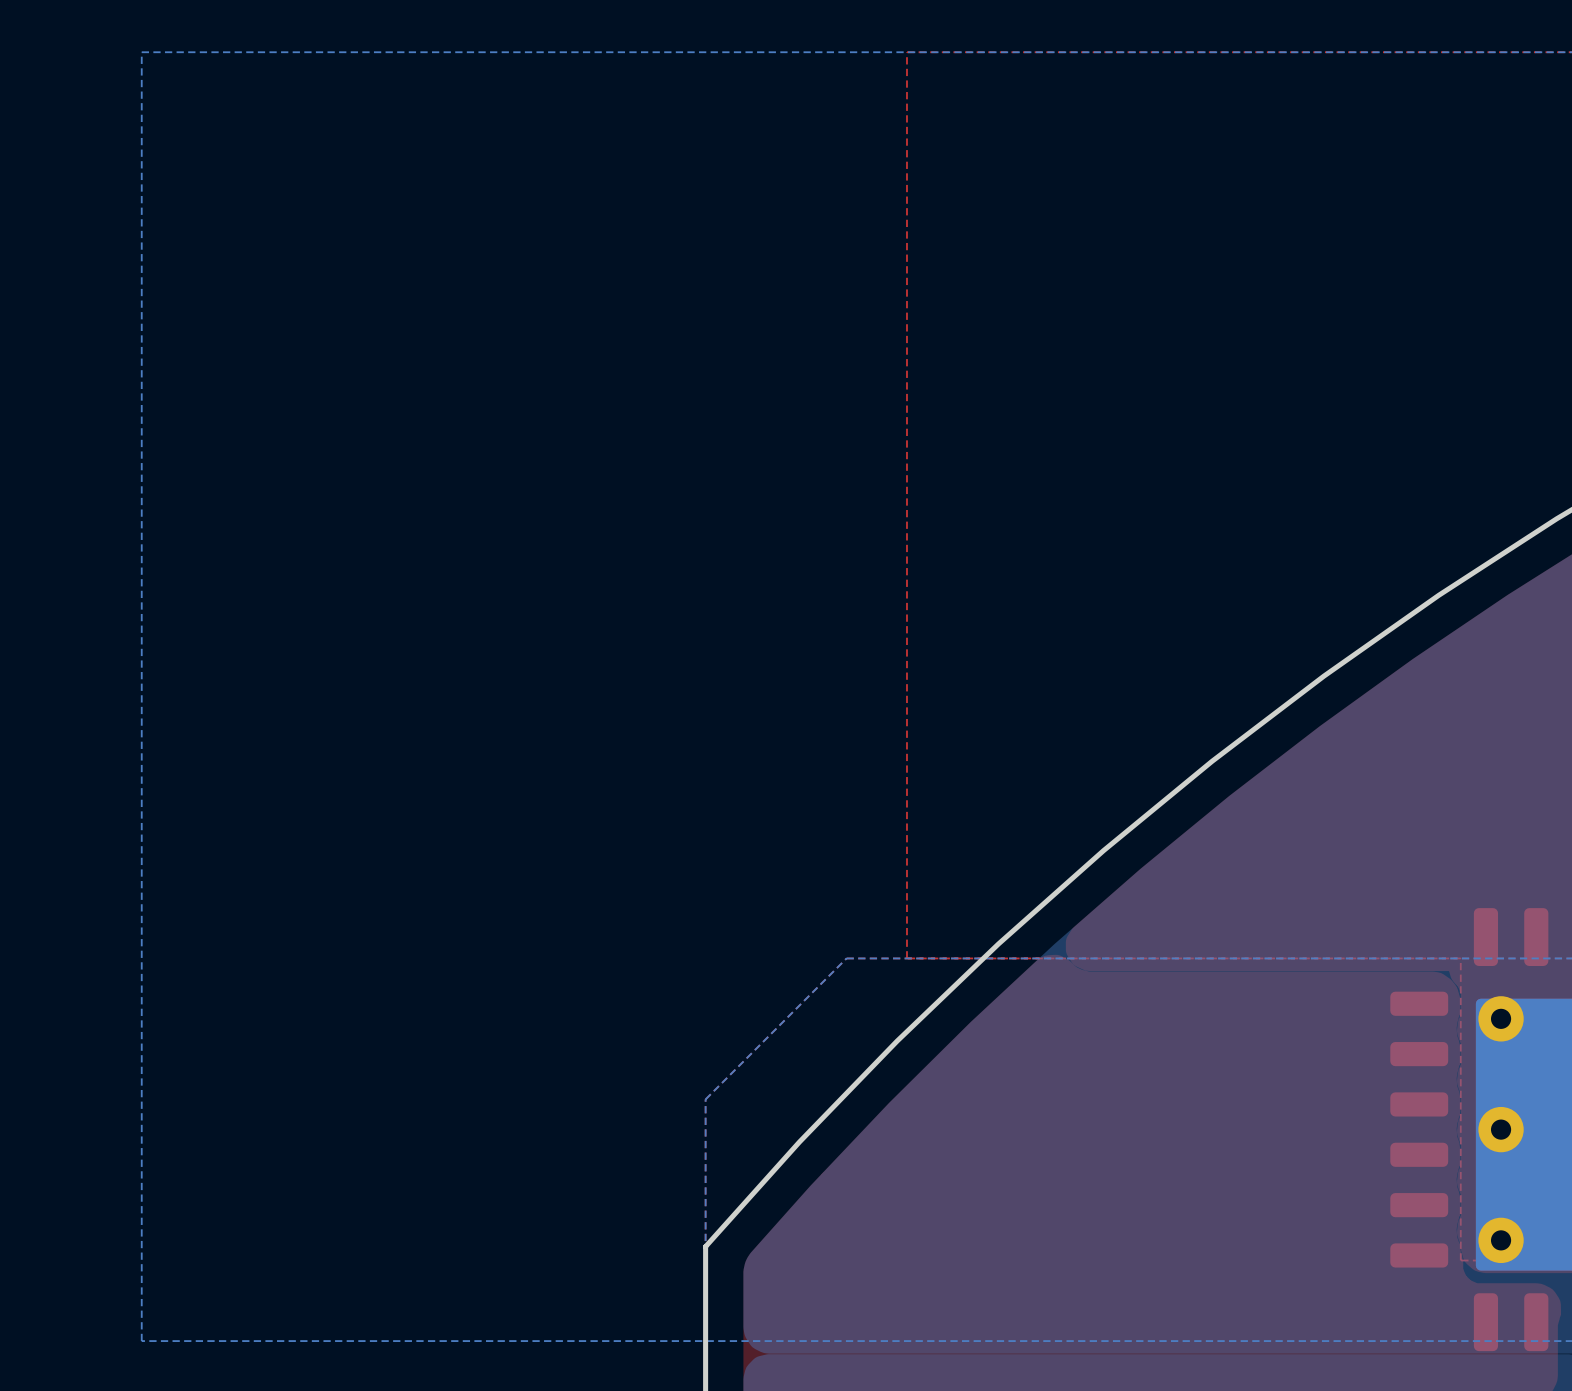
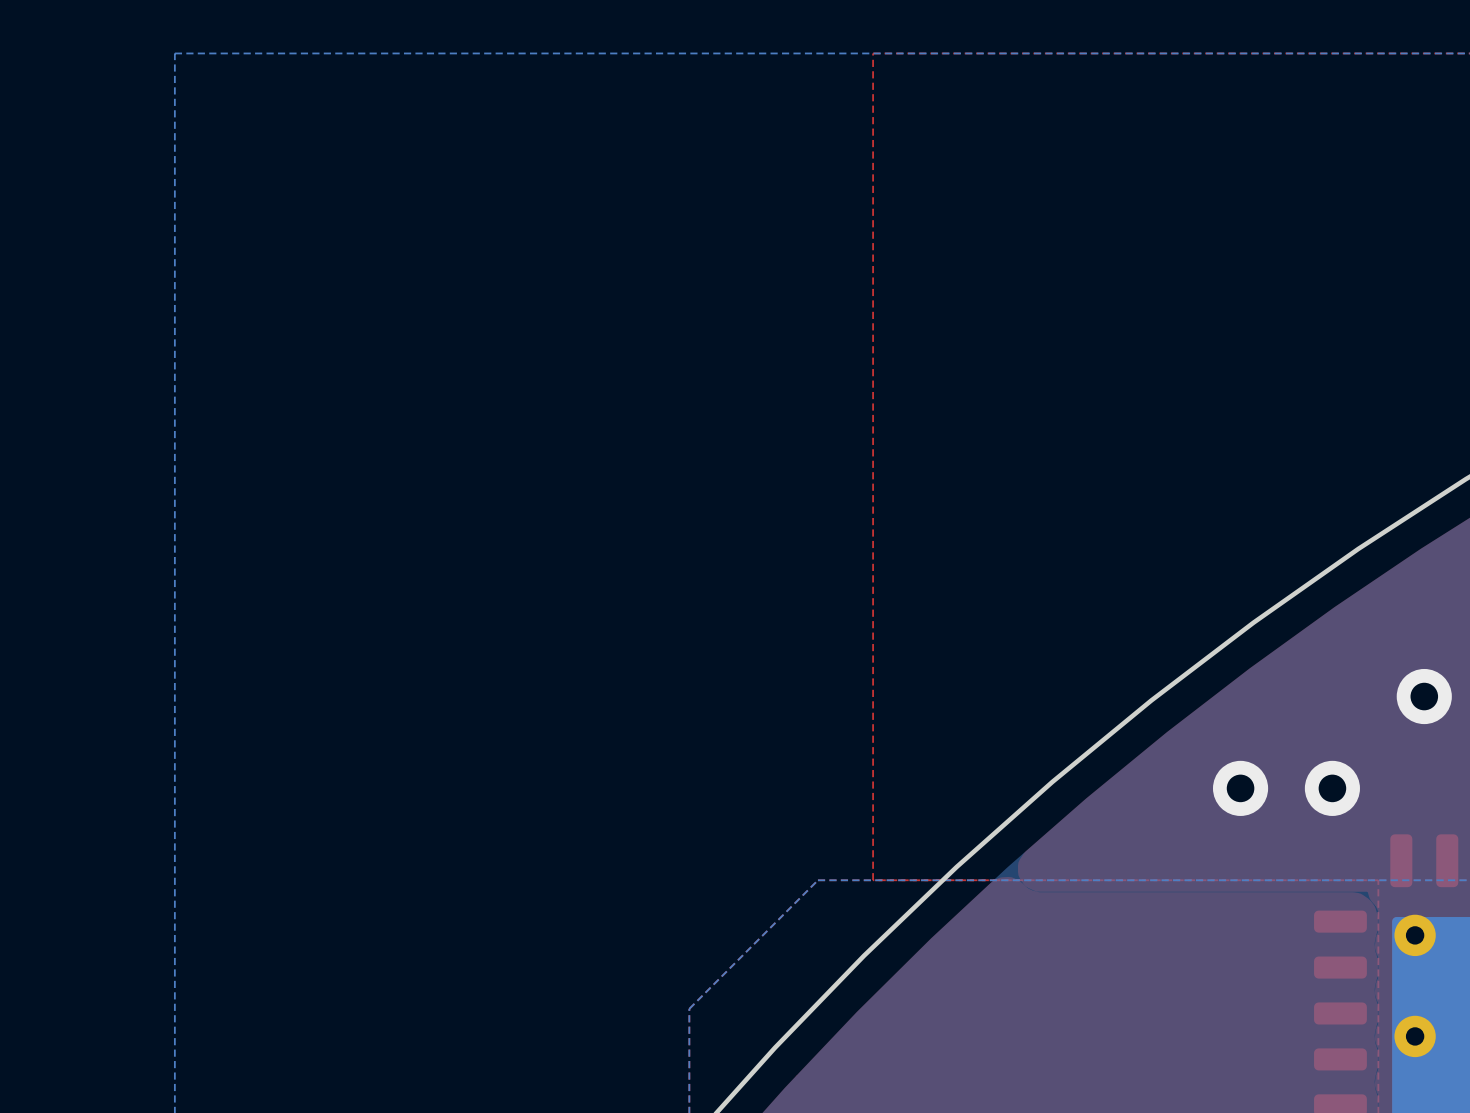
via: none -> (1424, 696)
via: none -> (1240, 788)
via: none -> (1332, 788)

